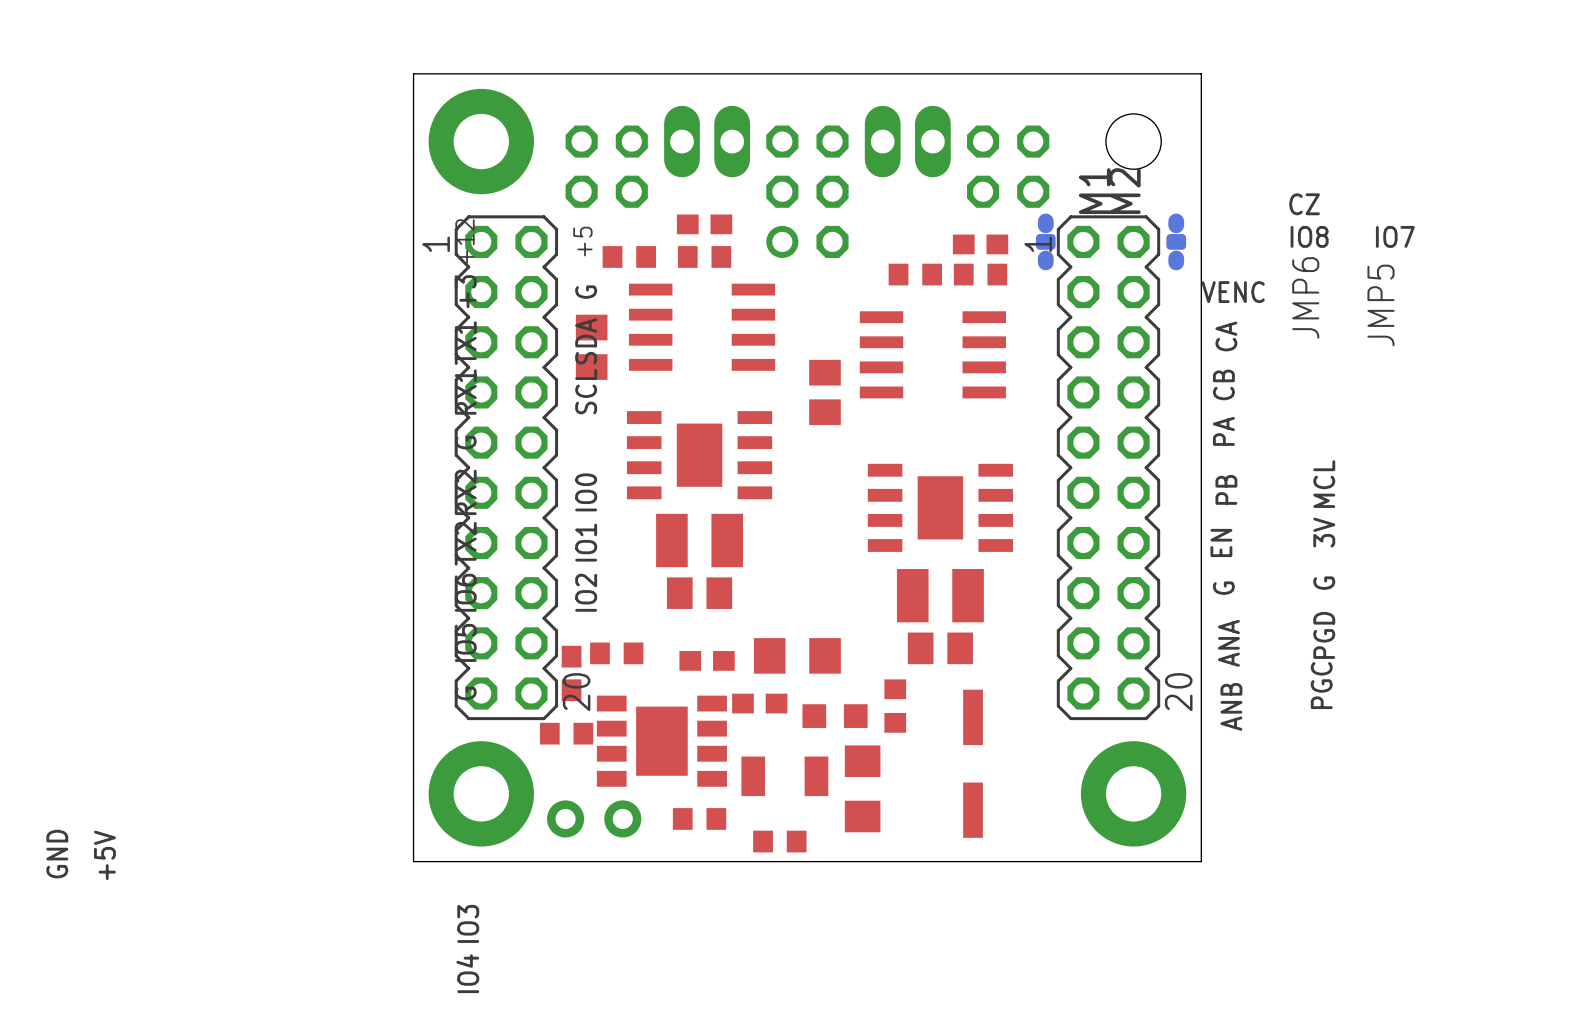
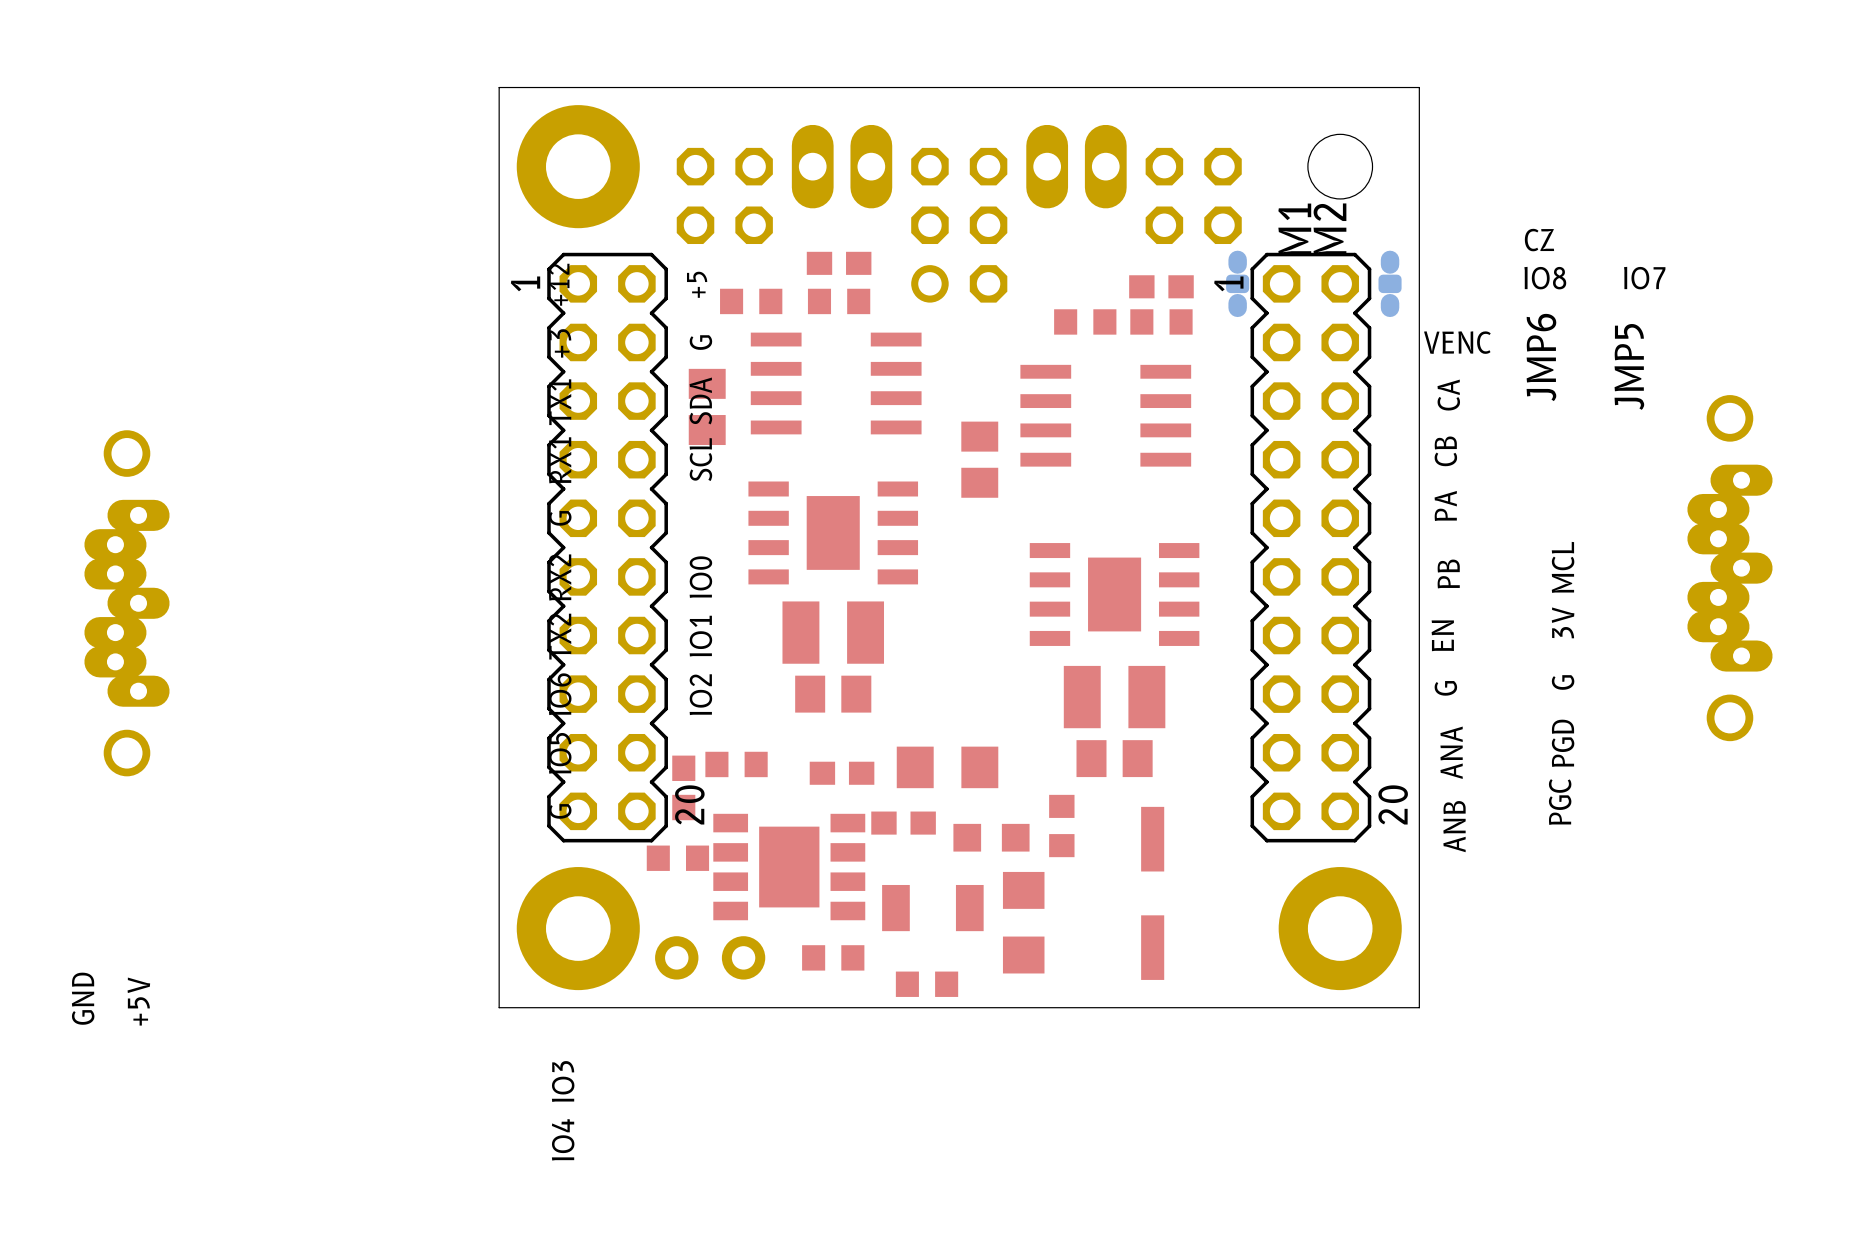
part: none -> (1729, 568)
part: none -> (126, 603)

